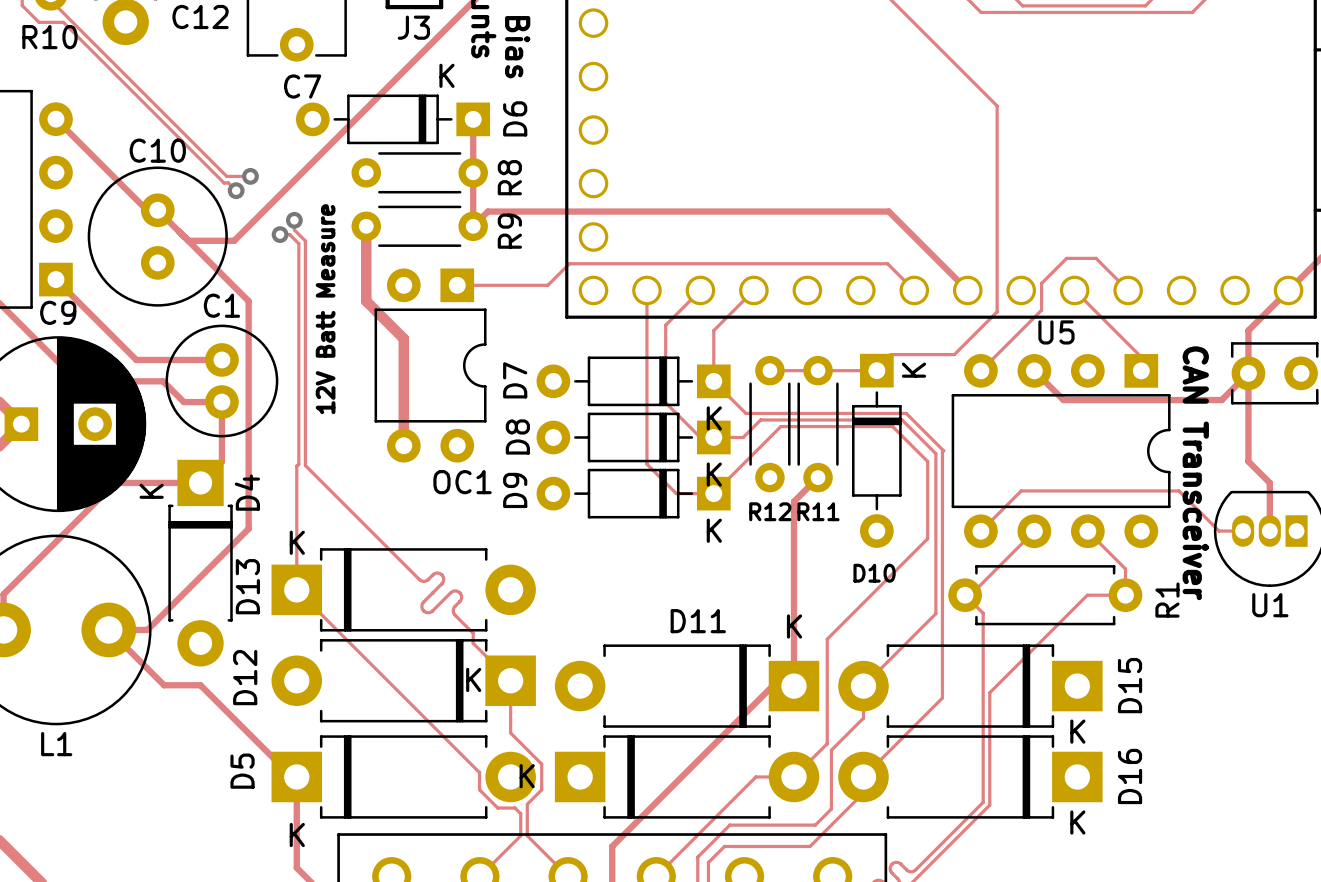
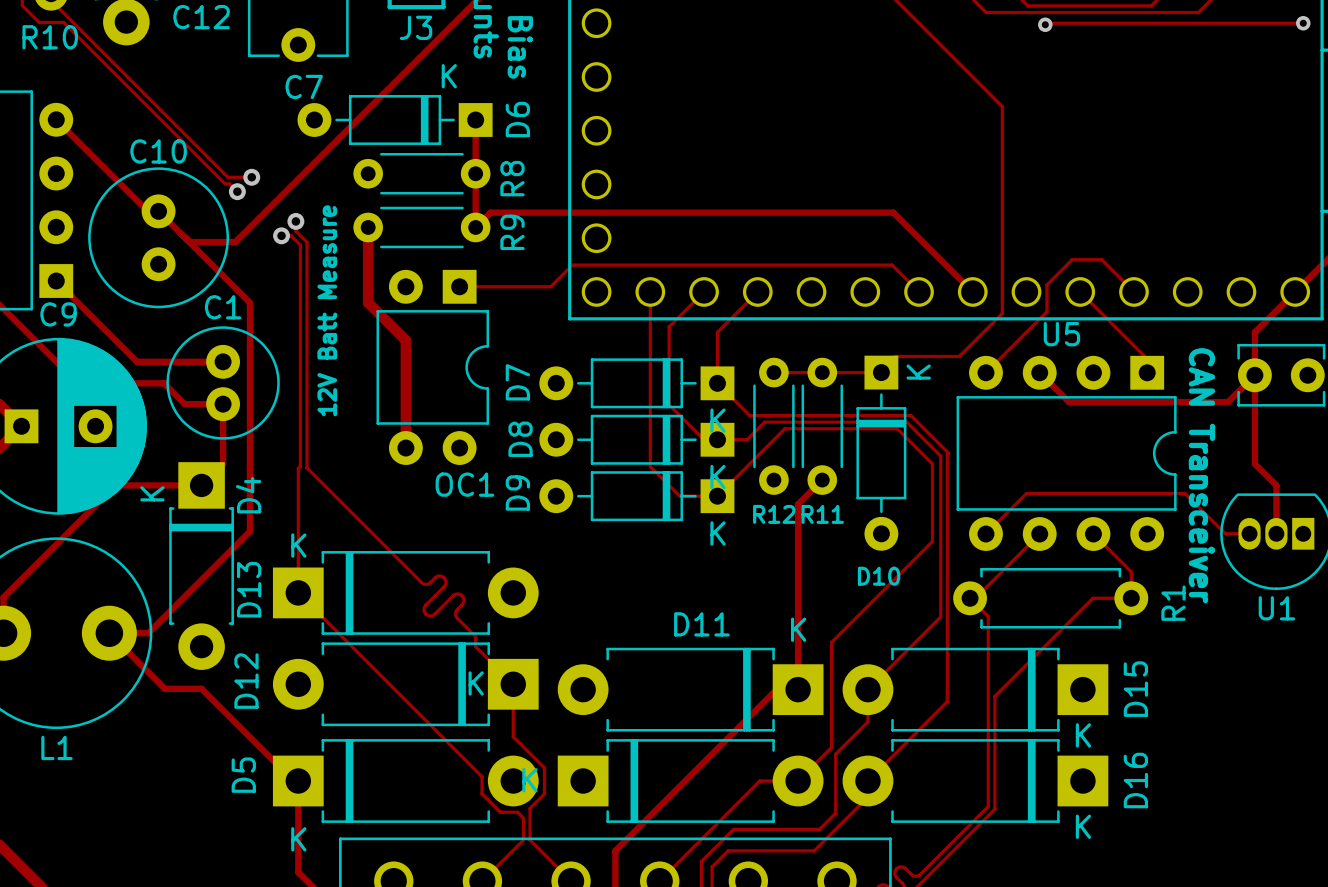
track: none -> (1303, 23) (1045, 24)
via: none -> (1303, 23)
via: none -> (1045, 24)

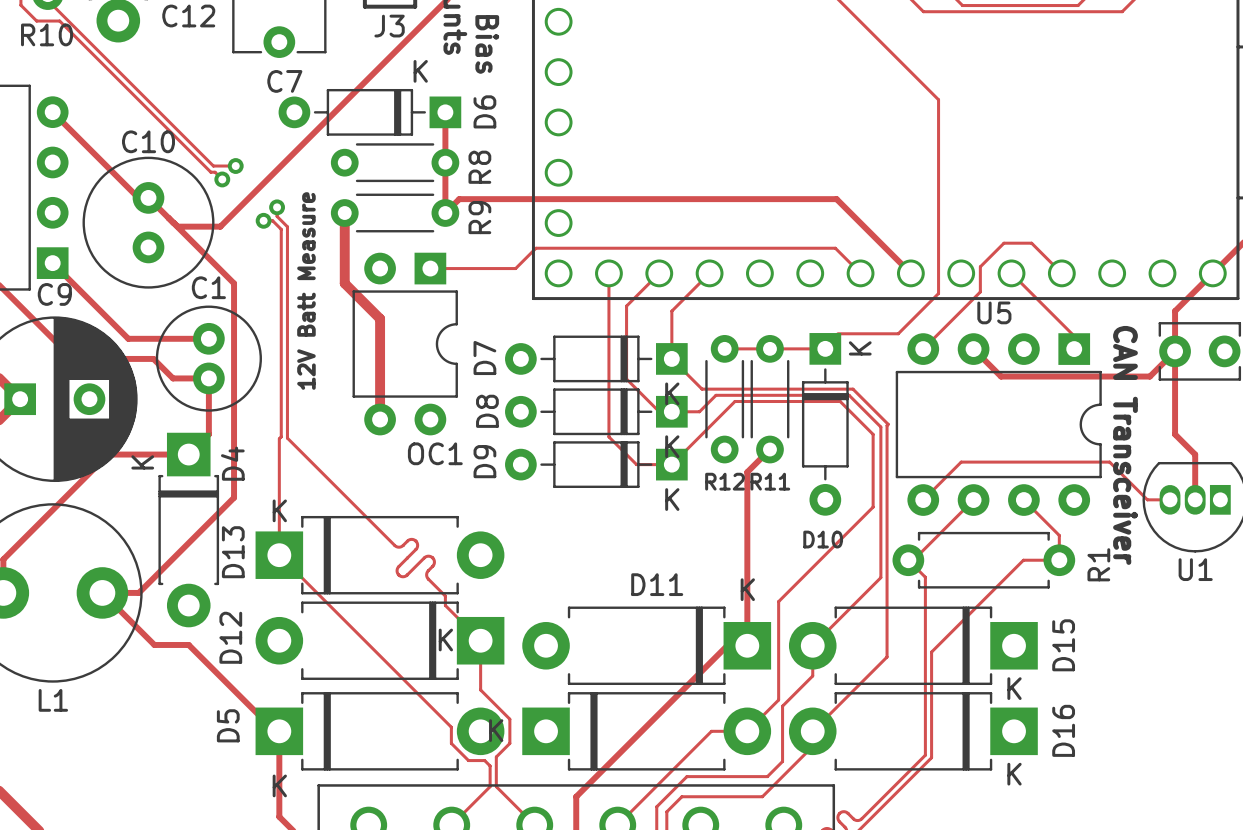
track: (1303, 23) (1045, 24) -> none
via: (1303, 23) -> none
via: (1045, 24) -> none

